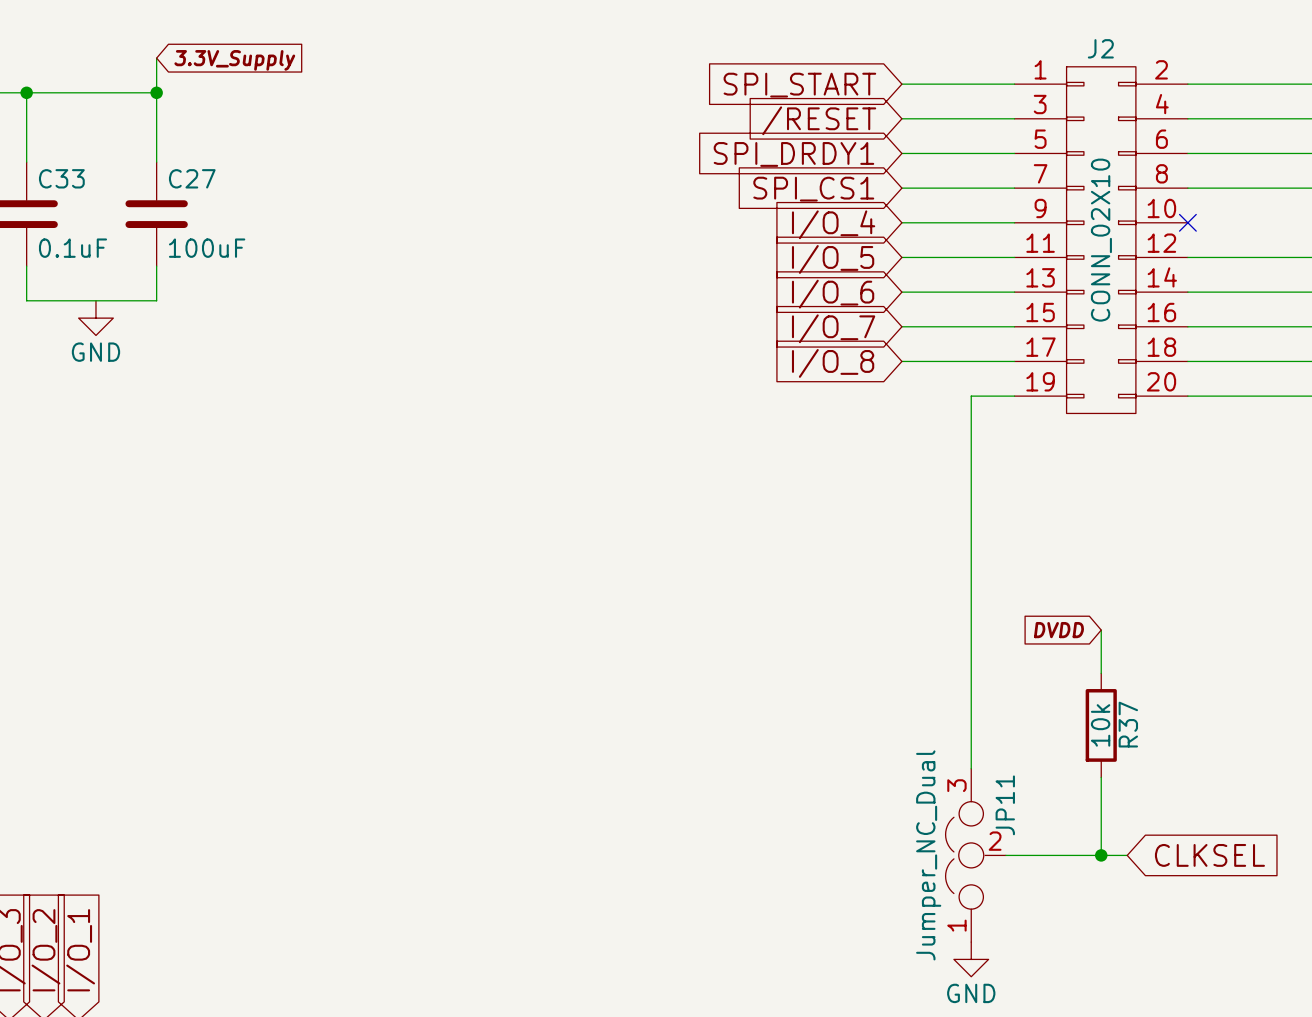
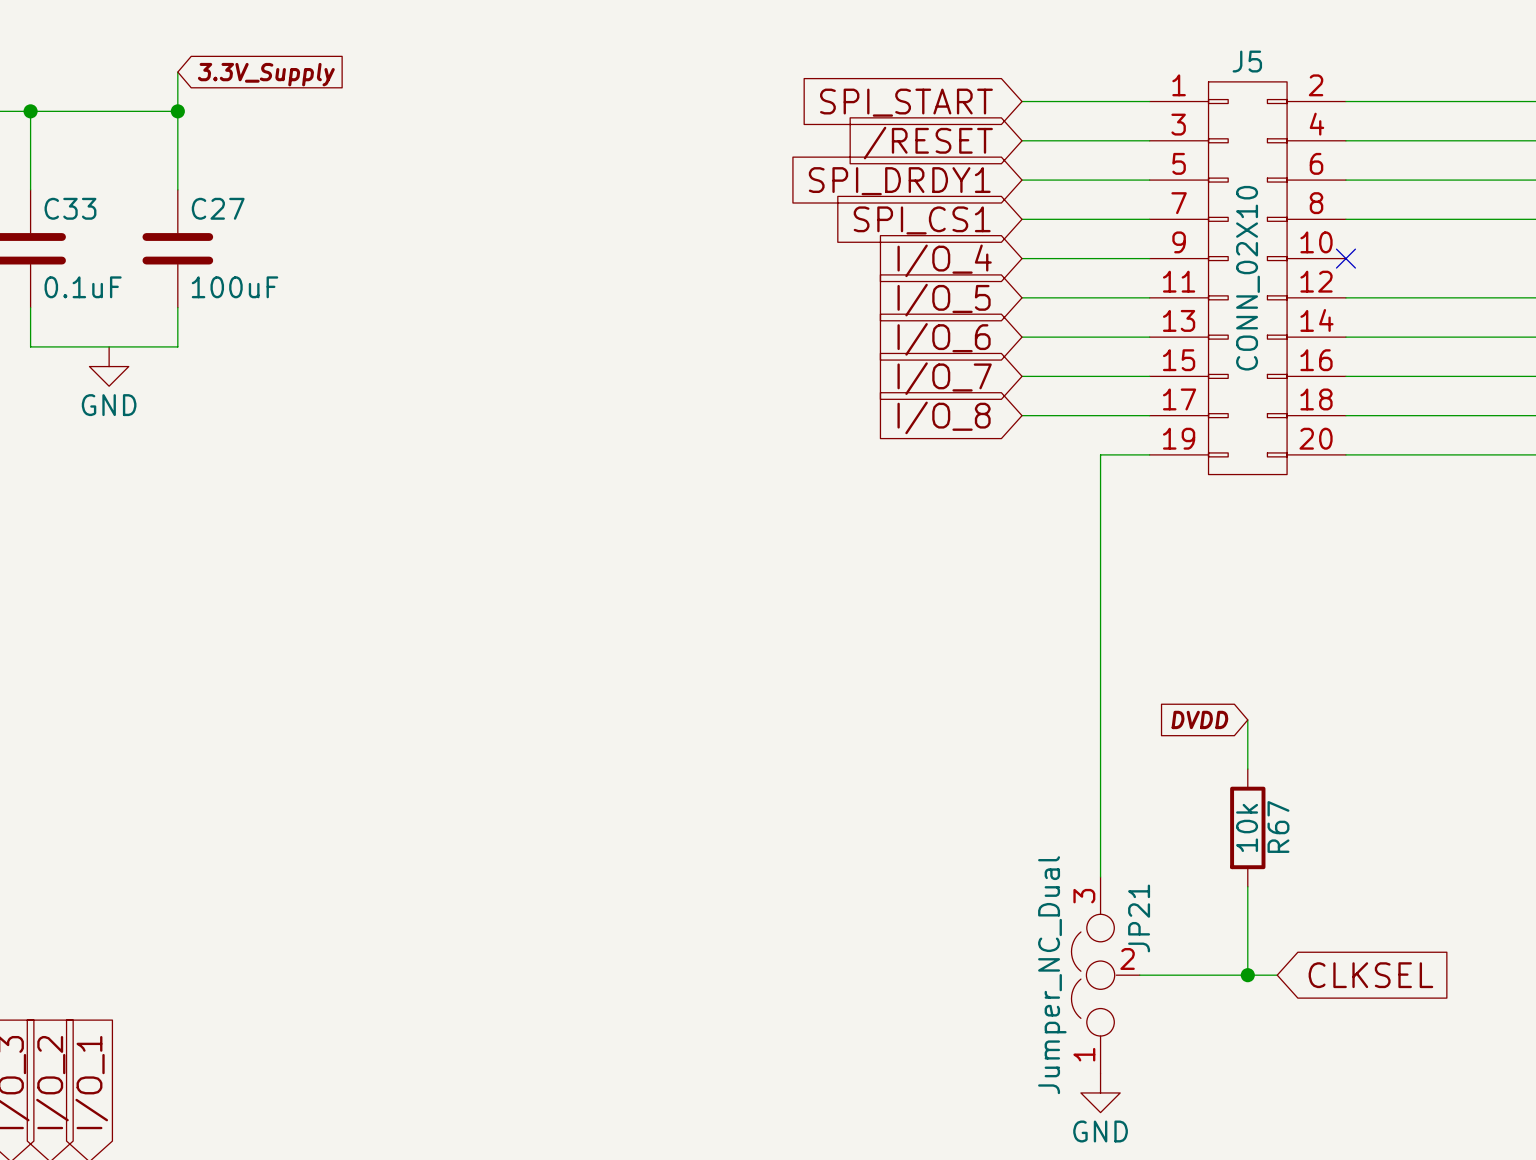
J2 name: J2 (1100, 48) -> J5 (1247, 61)
R37 name: R37 (1128, 724) -> R67 (1278, 827)
JP11 name: JP11 (1005, 805) -> JP21 (1139, 918)

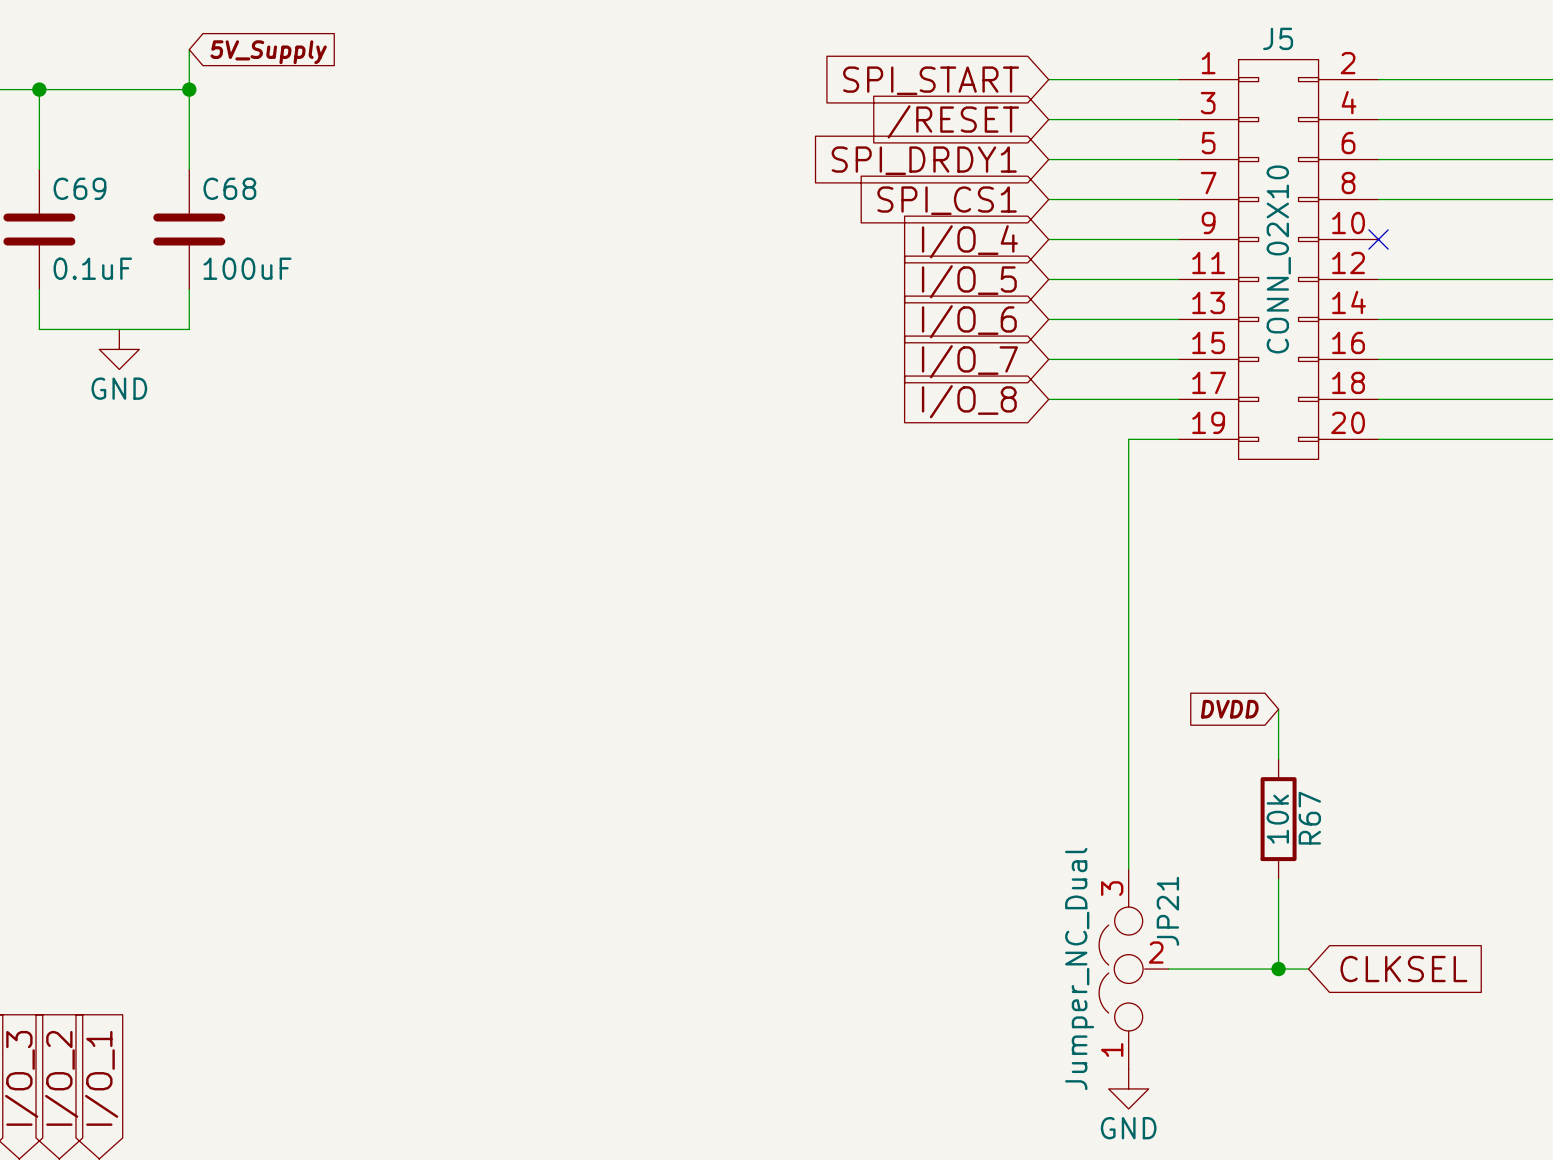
global label: 3.3V_Supply (266, 74) -> 5V_Supply (268, 52)
C33 name: C33 (70, 208) -> C69 (79, 188)
C27 name: C27 (218, 208) -> C68 (229, 188)

